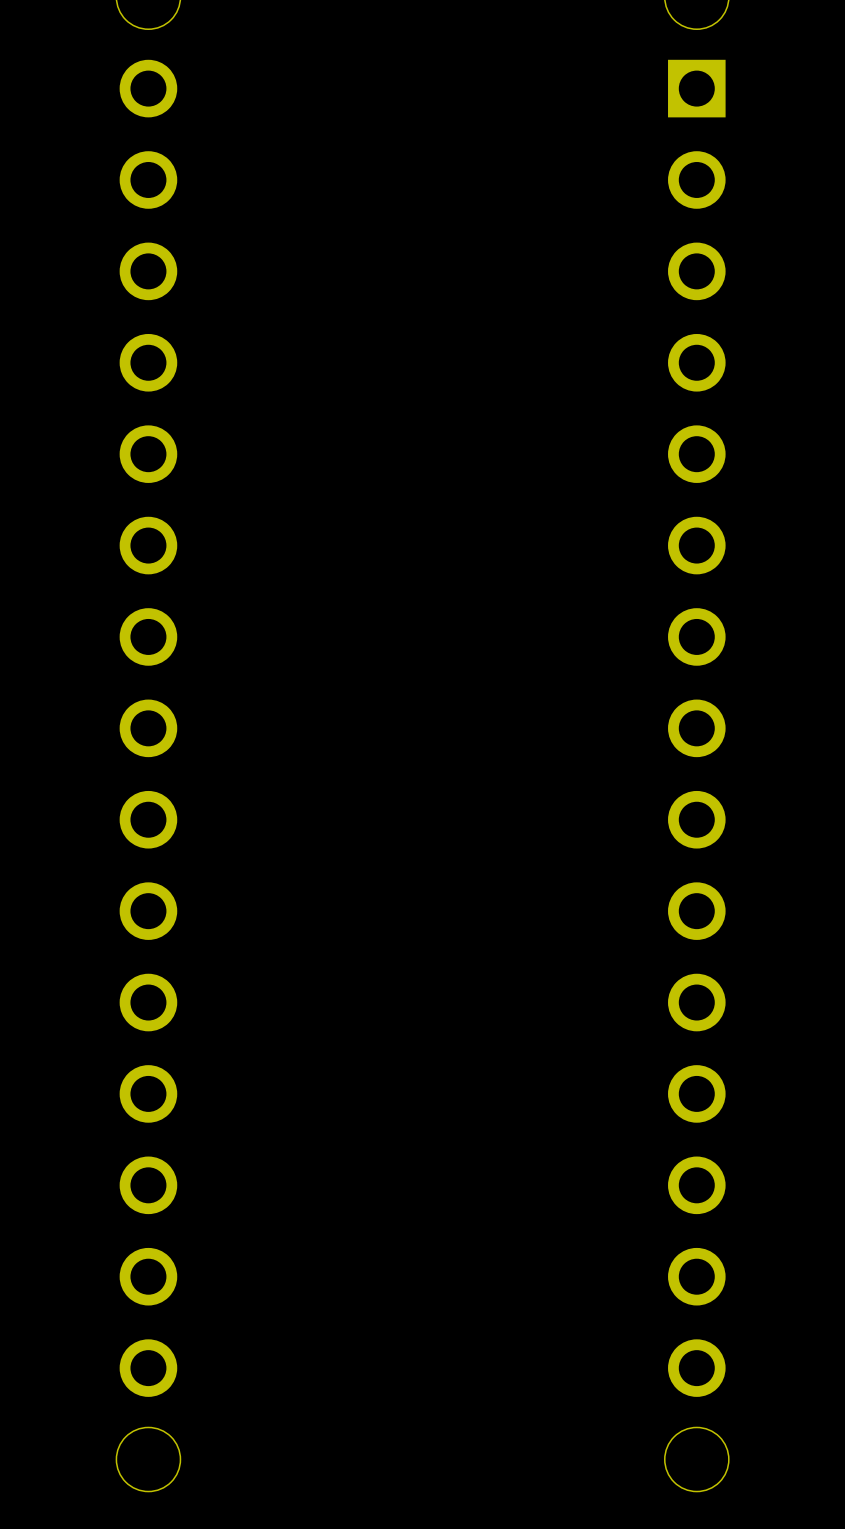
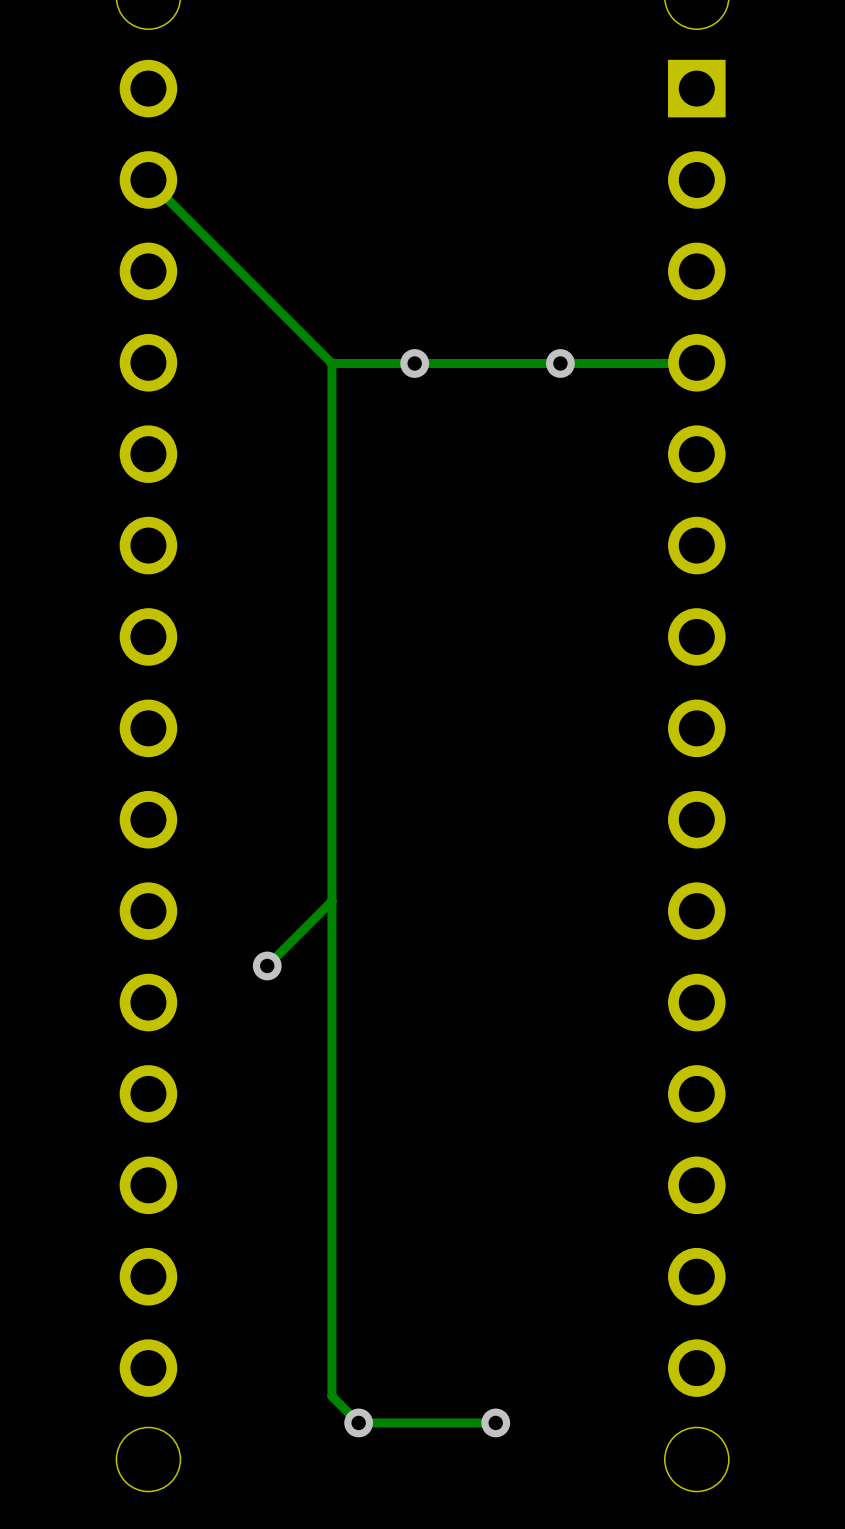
track: none -> (148, 179) (331, 363)
track: none -> (696, 362) (331, 363)
track: none -> (331, 363) (331, 1396) (358, 1422) (495, 1422)
via: none -> (414, 363)
via: none -> (560, 363)
track: none -> (331, 901) (267, 965)
via: none -> (267, 965)
via: none -> (358, 1422)
via: none -> (495, 1422)

